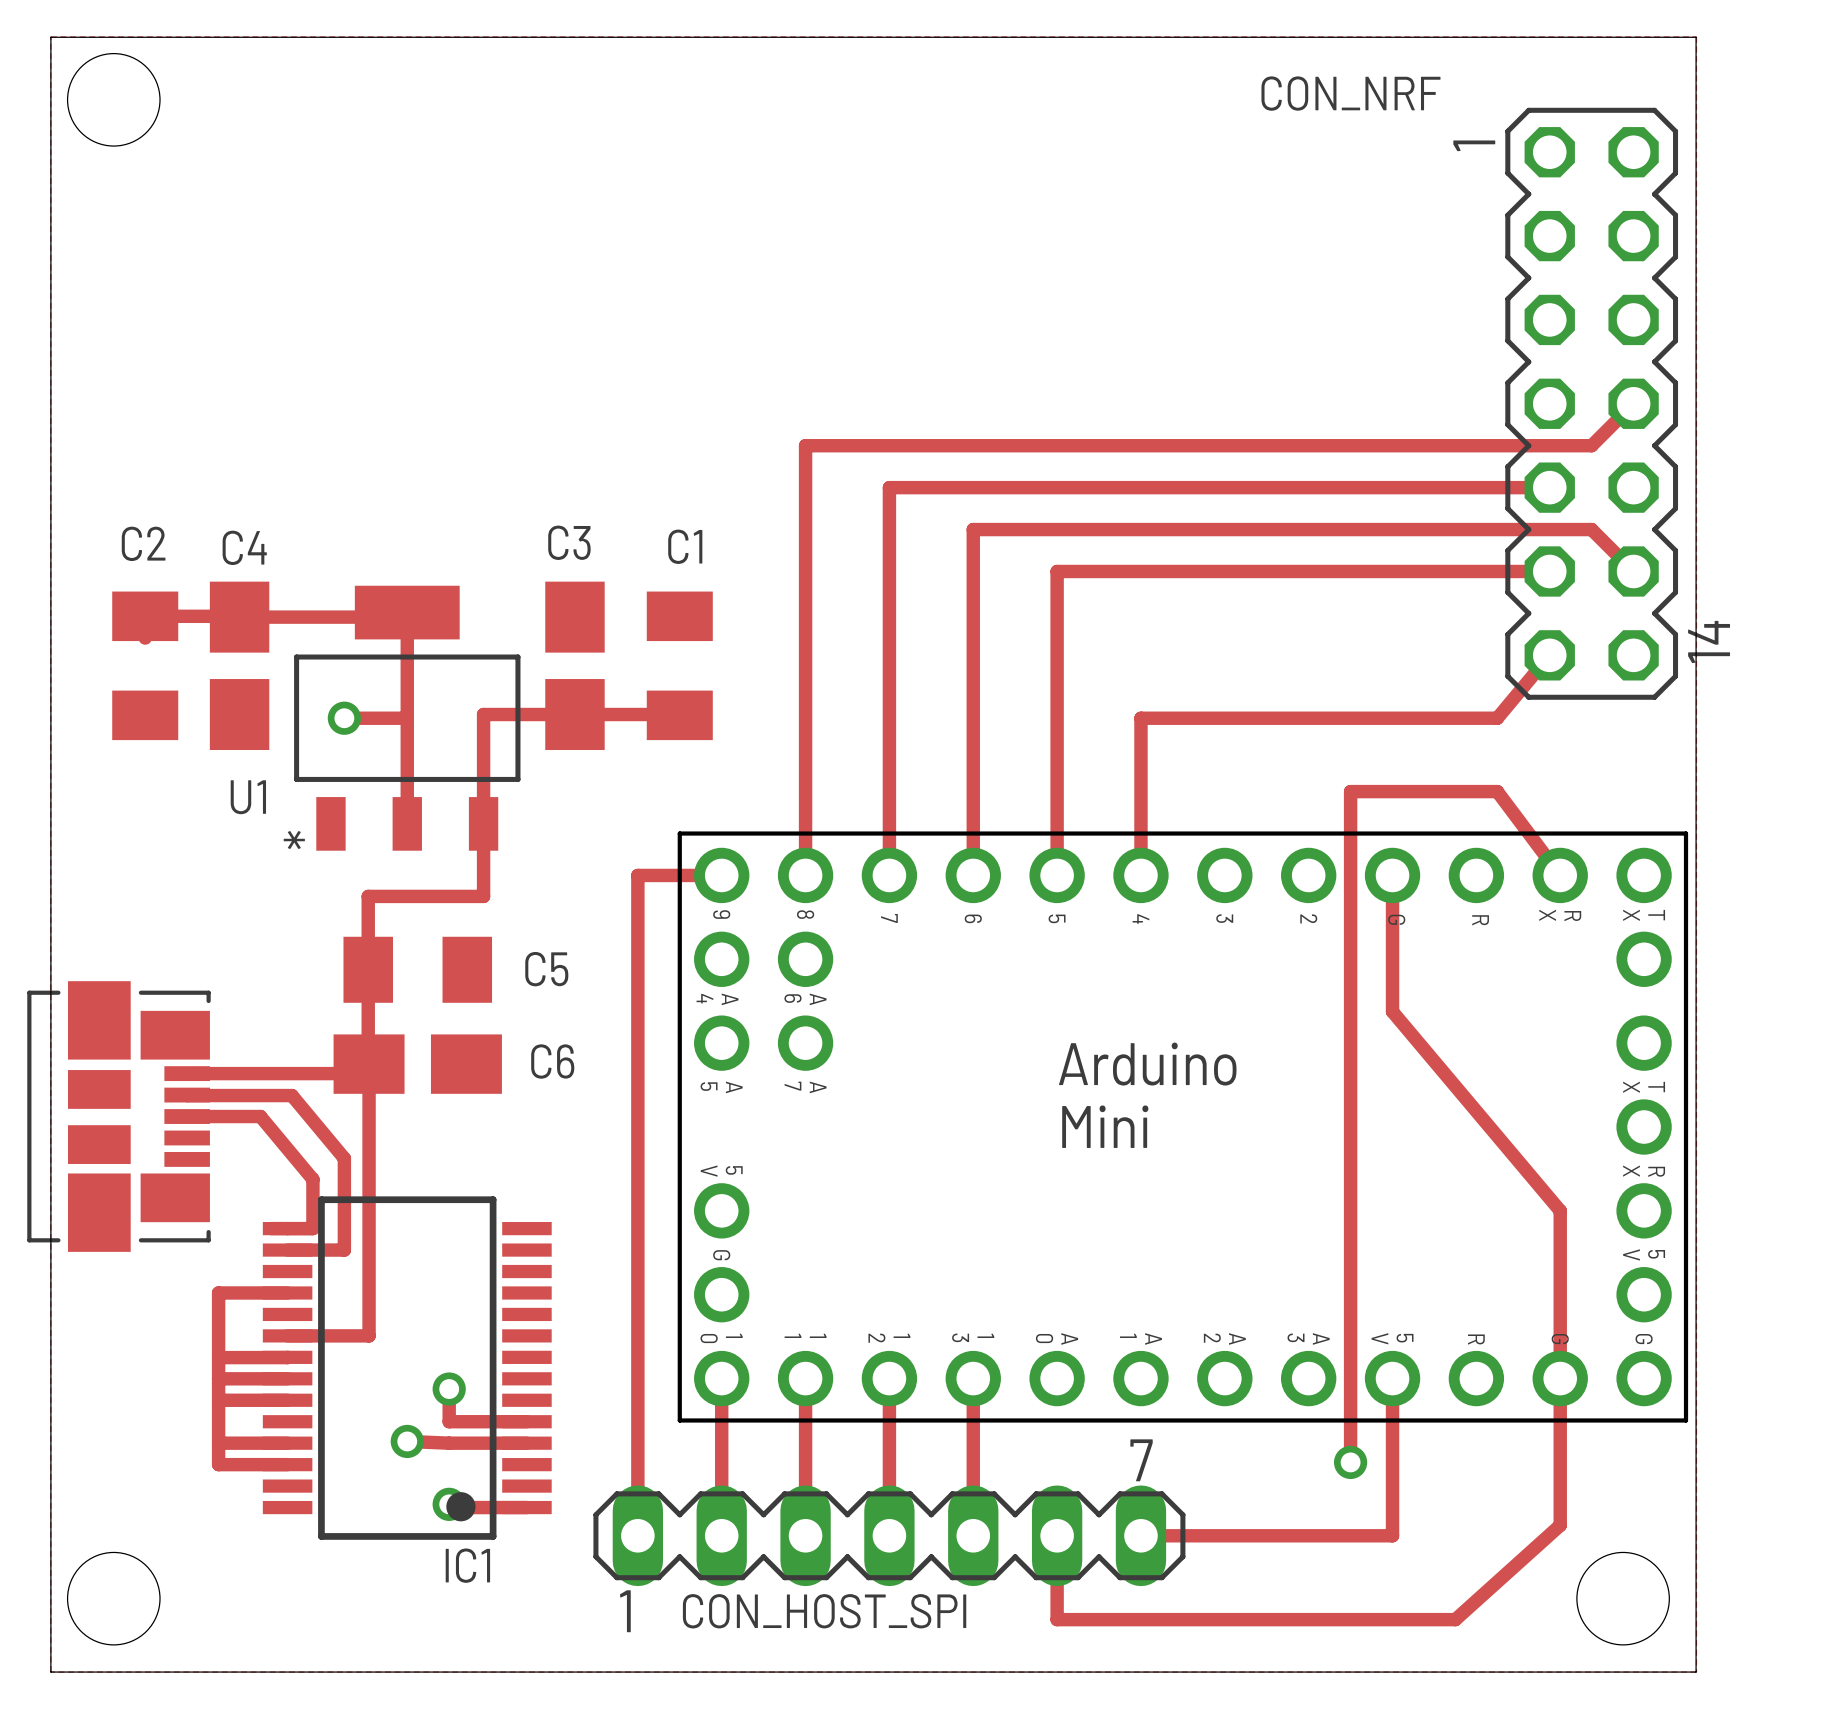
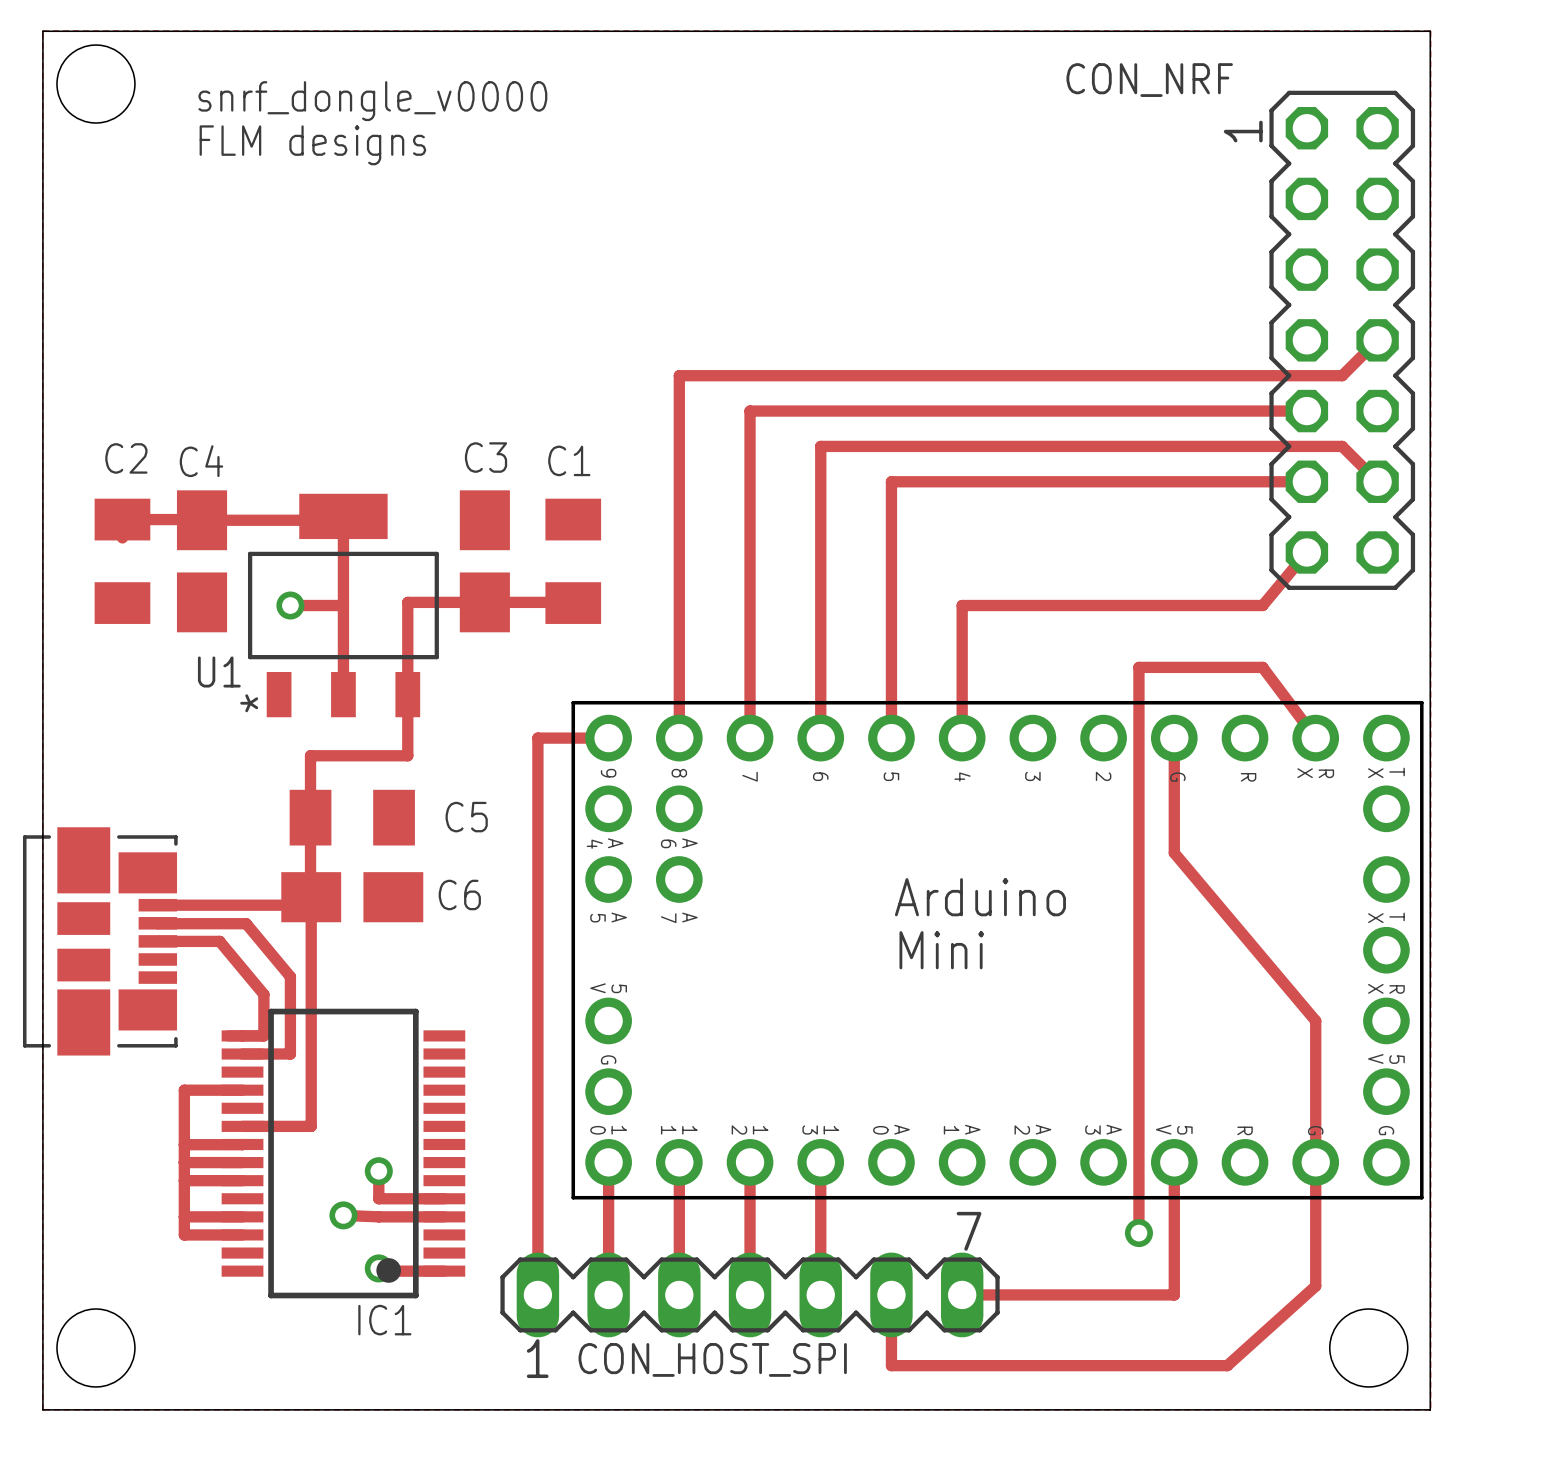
text: none -> snrf_dongle_v0000 (372, 101)
text: none -> FLM designs (312, 145)
CON_NRF text: 14 (1709, 641) -> none

